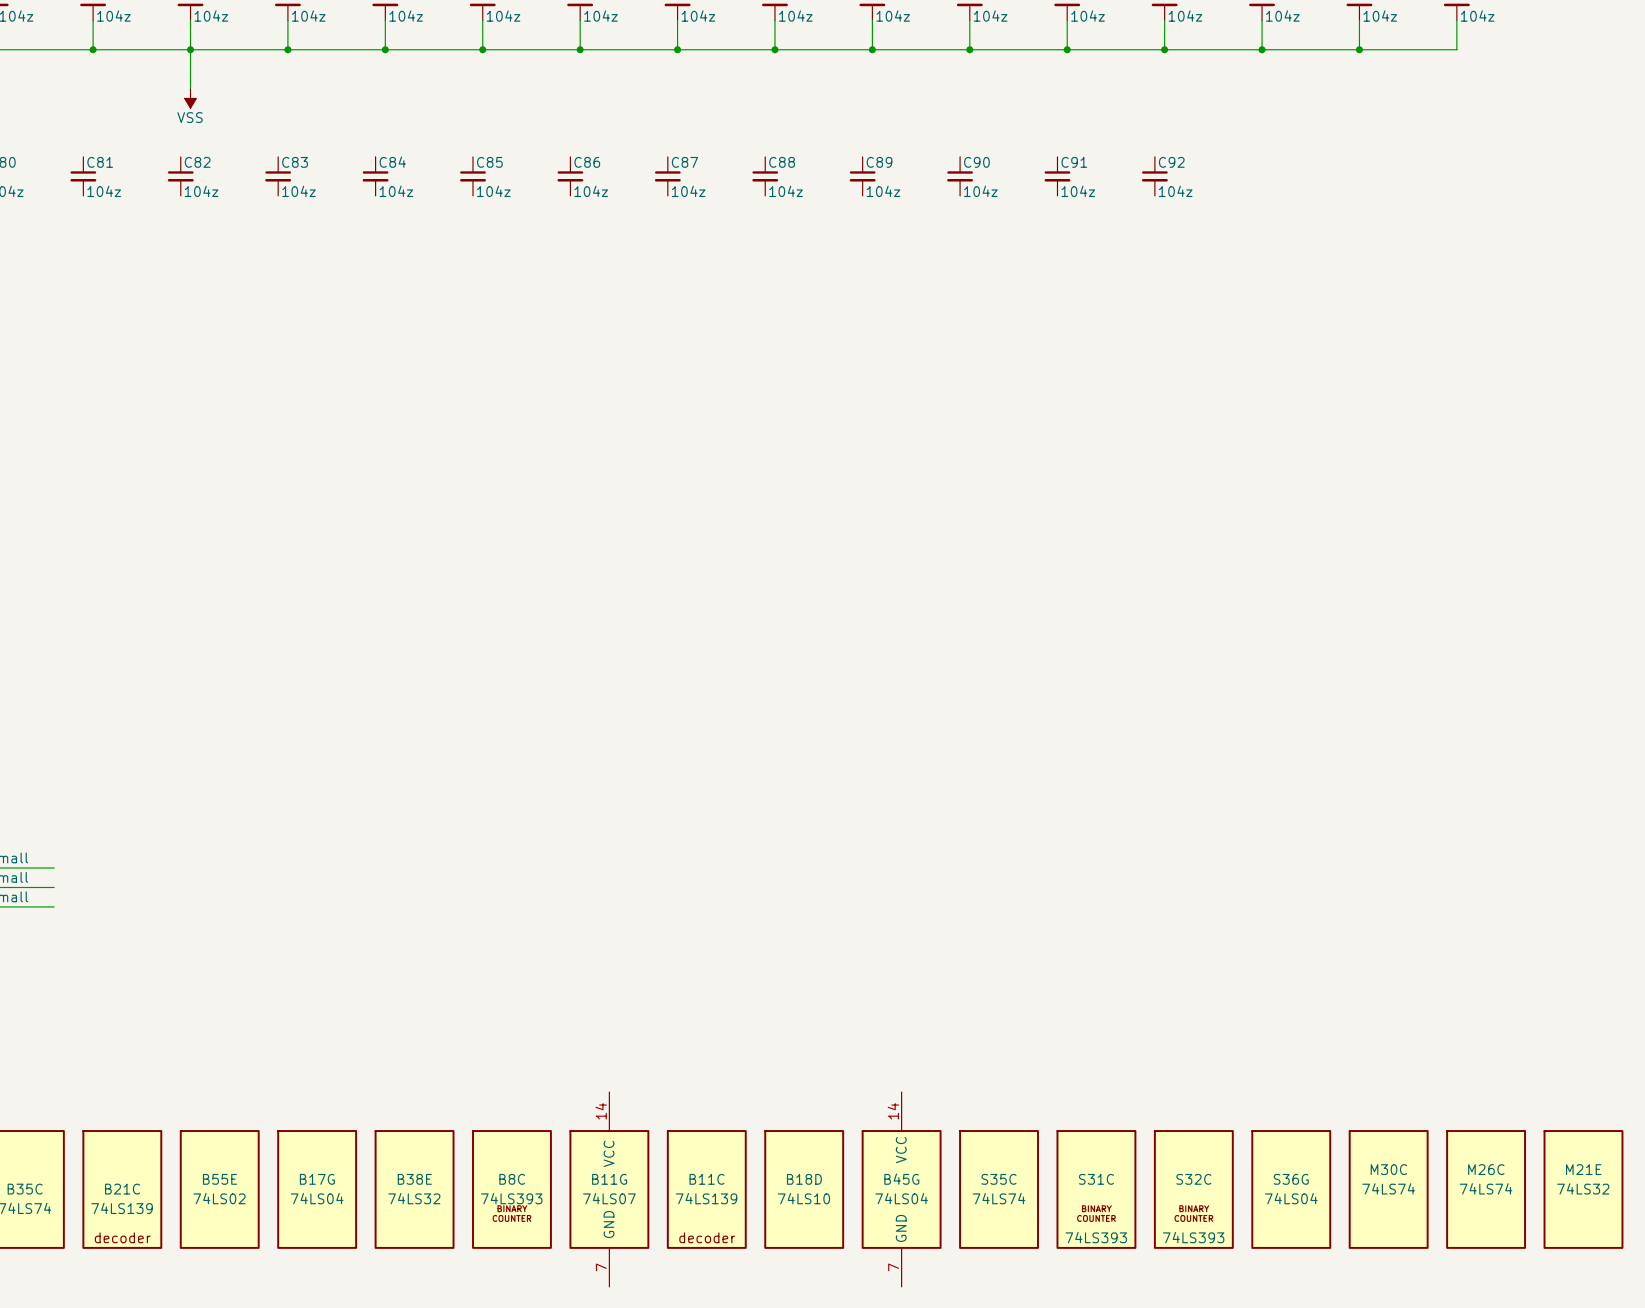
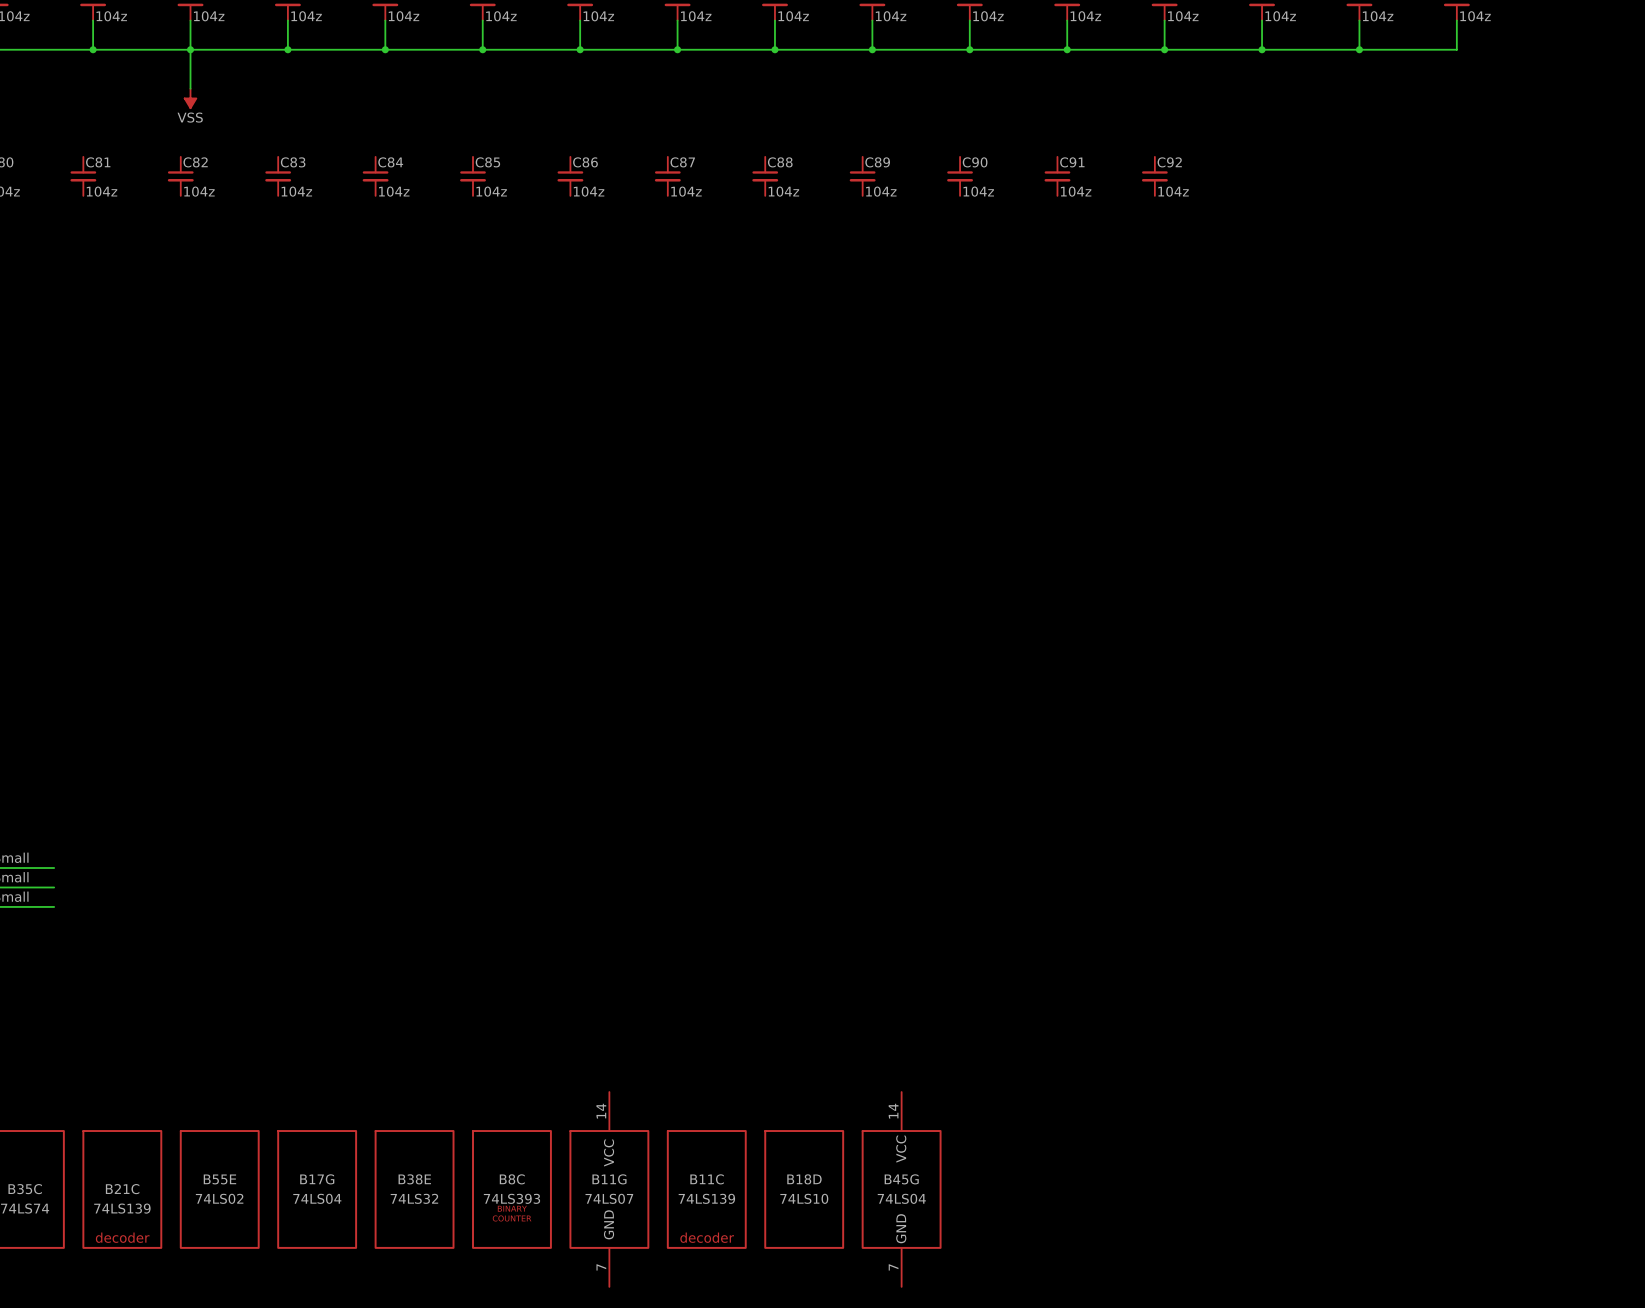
S35C: 74LS74 (999, 1189) -> none
S31C: 74LS393 (1096, 1189) -> none
S32C: 74LS393 (1193, 1189) -> none
S36G: 74LS04 (1291, 1189) -> none
M30C: 74LS74 (1388, 1189) -> none
M26C: 74LS74 (1486, 1189) -> none
M21E: 74LS32 (1583, 1189) -> none

